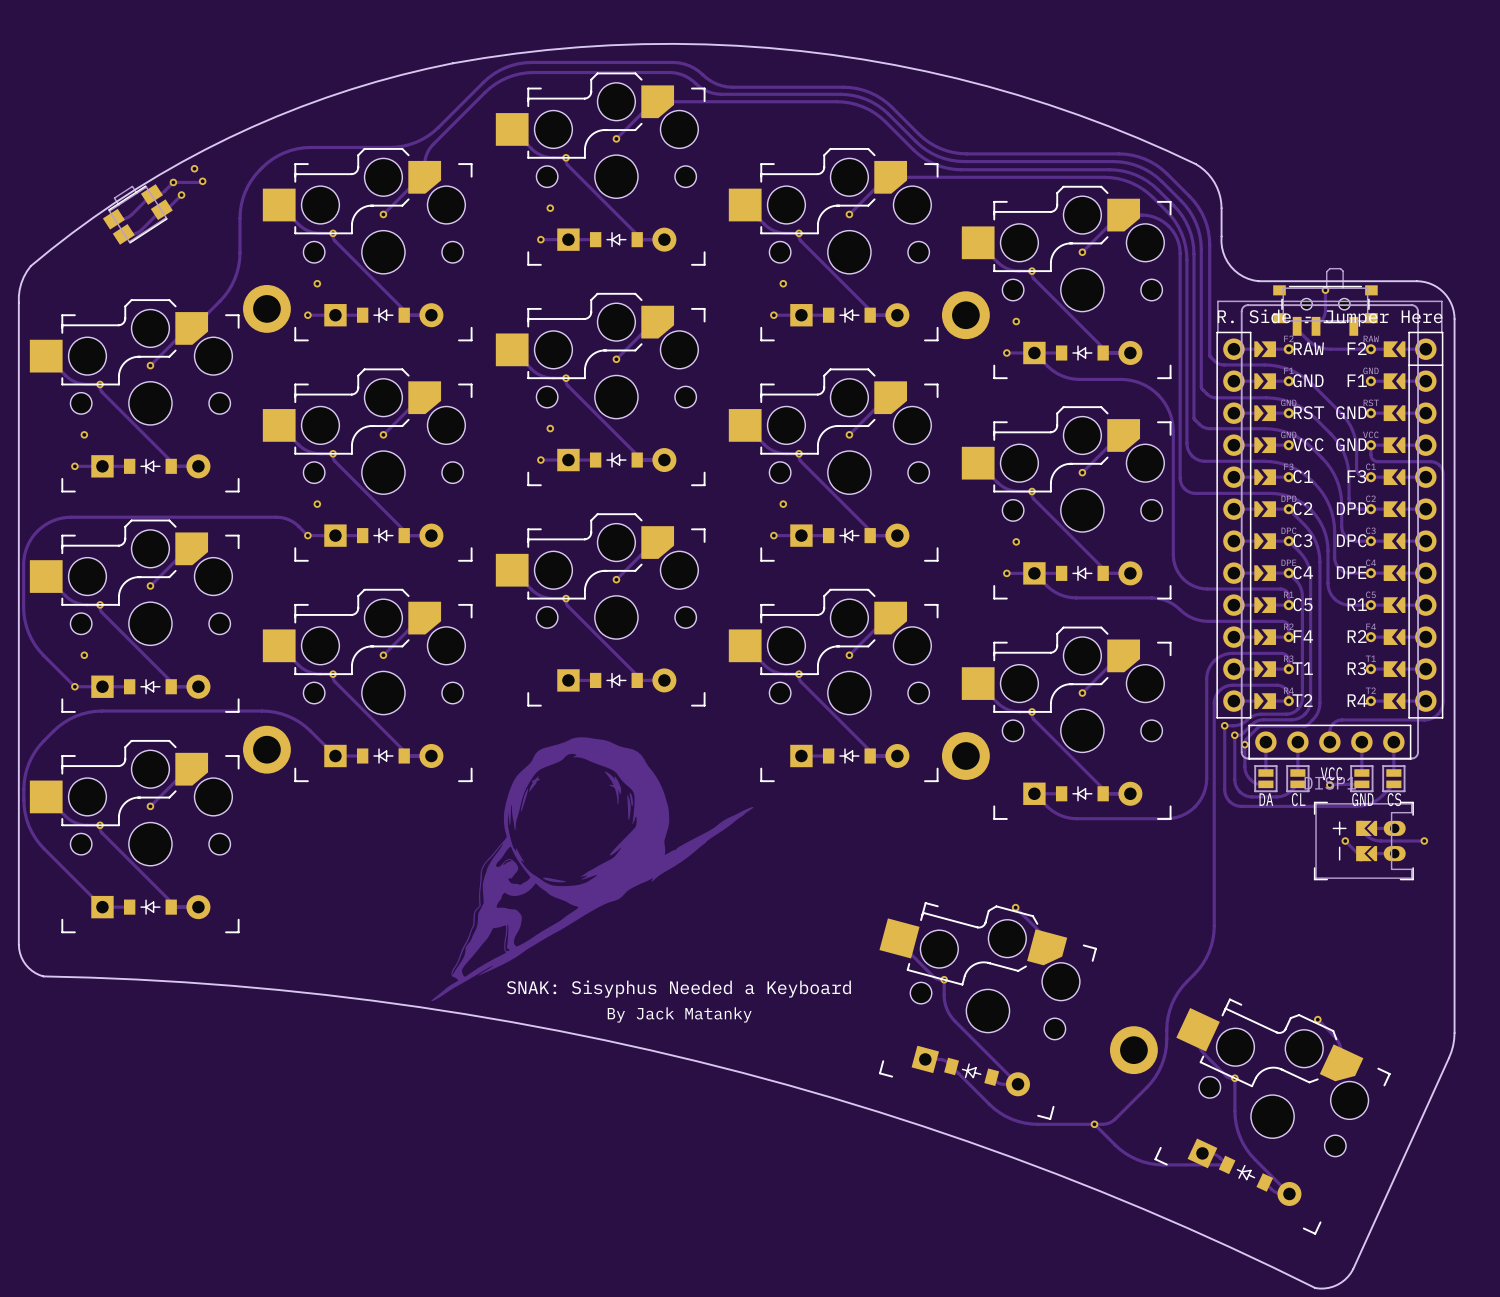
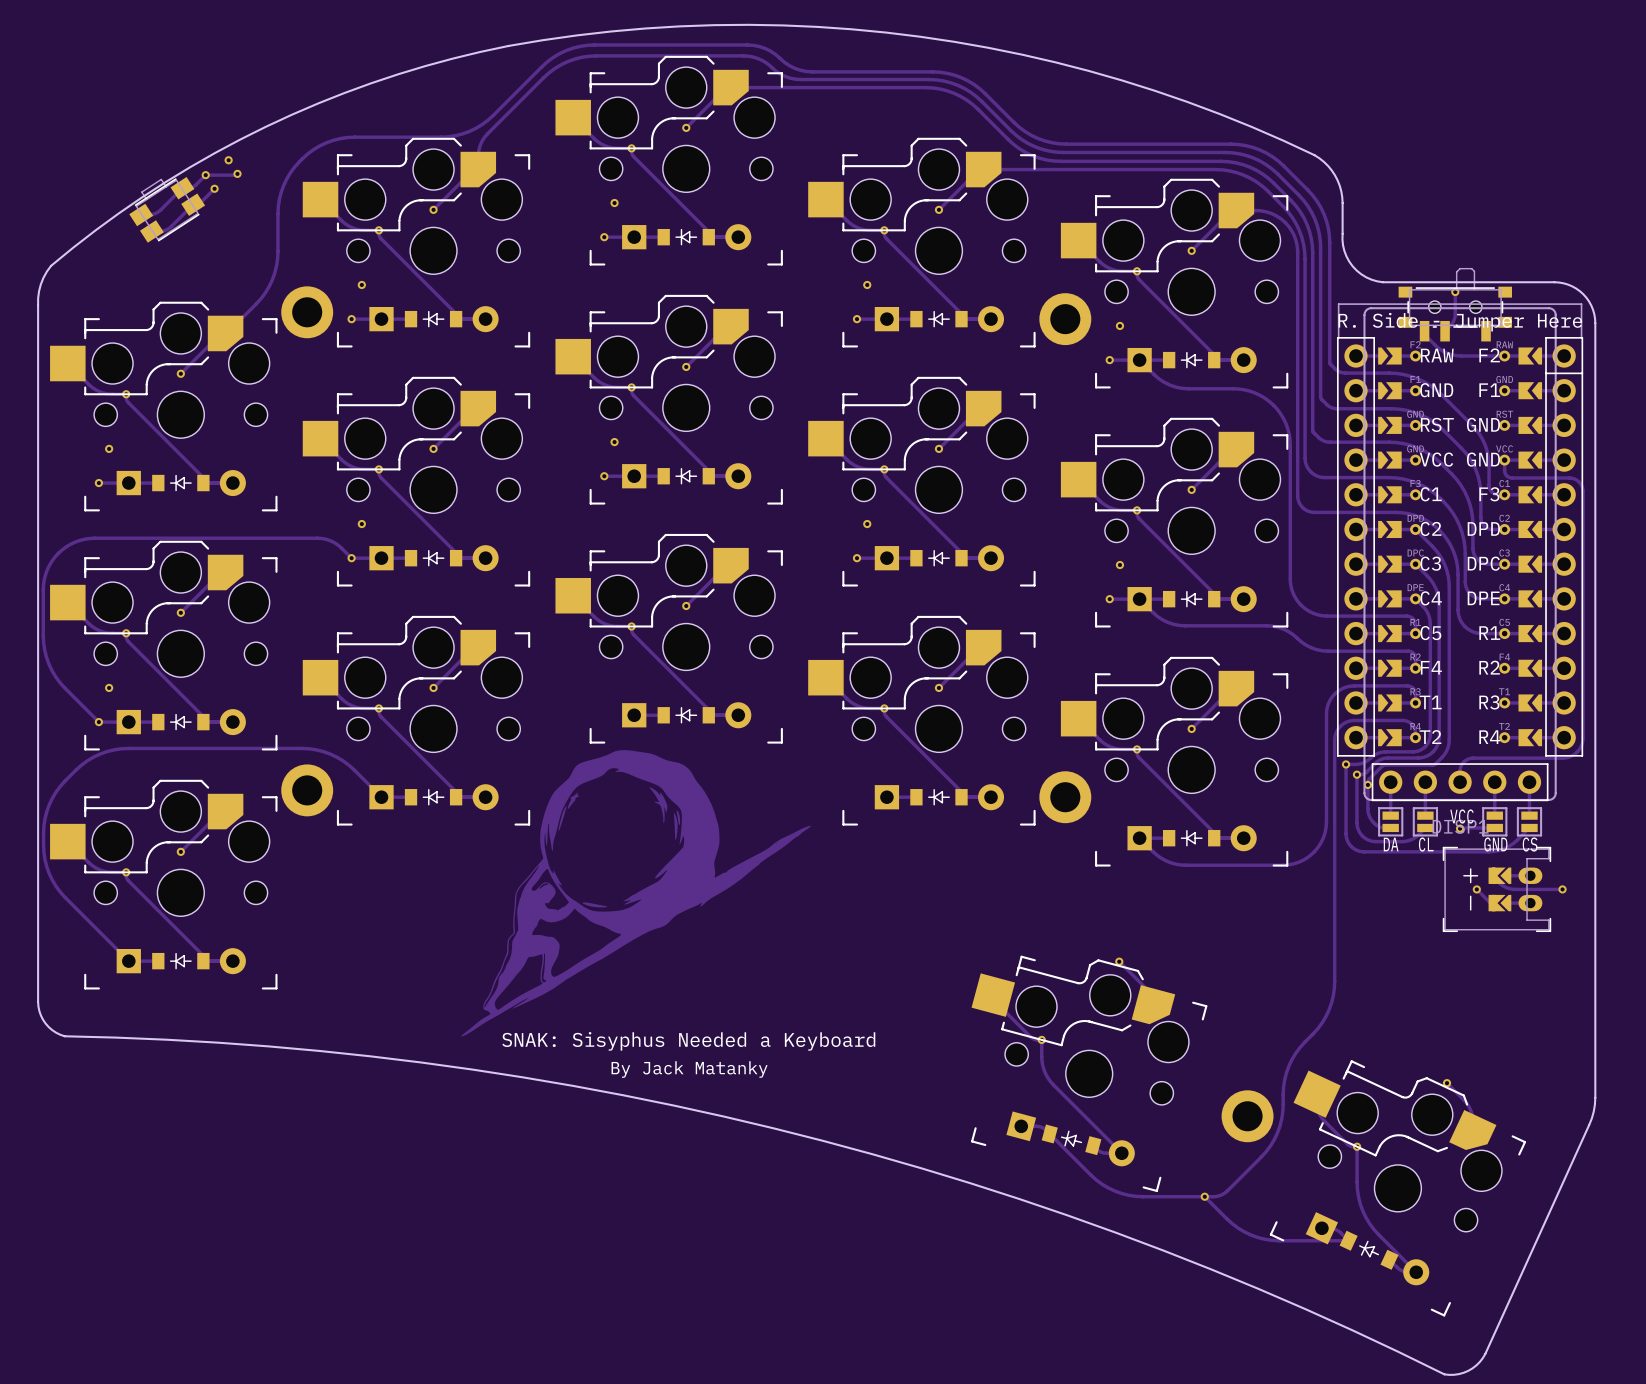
drawing position: (592, 869) -> (636, 893)
drawing position: (678, 1001) -> (688, 1054)

